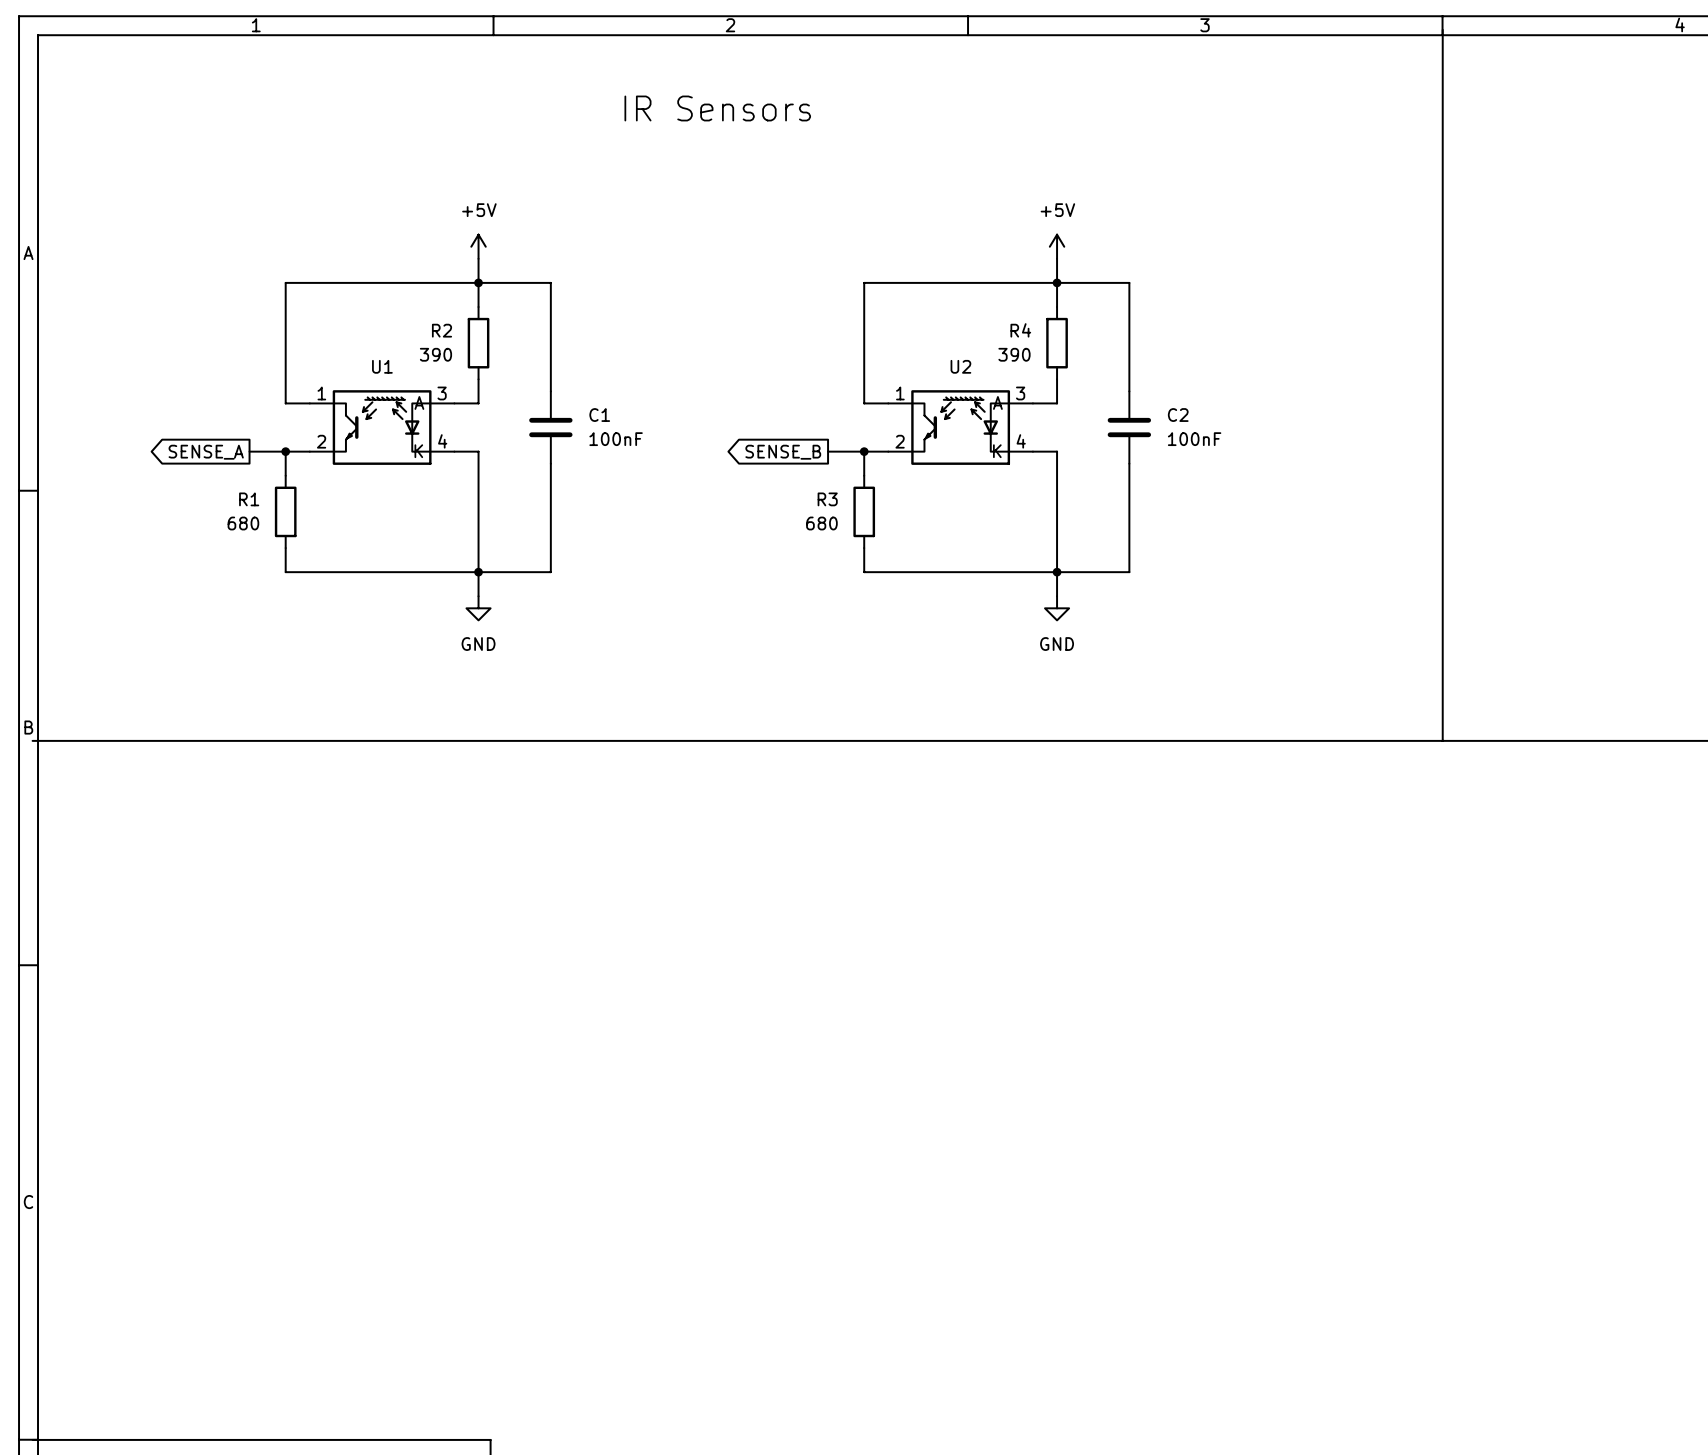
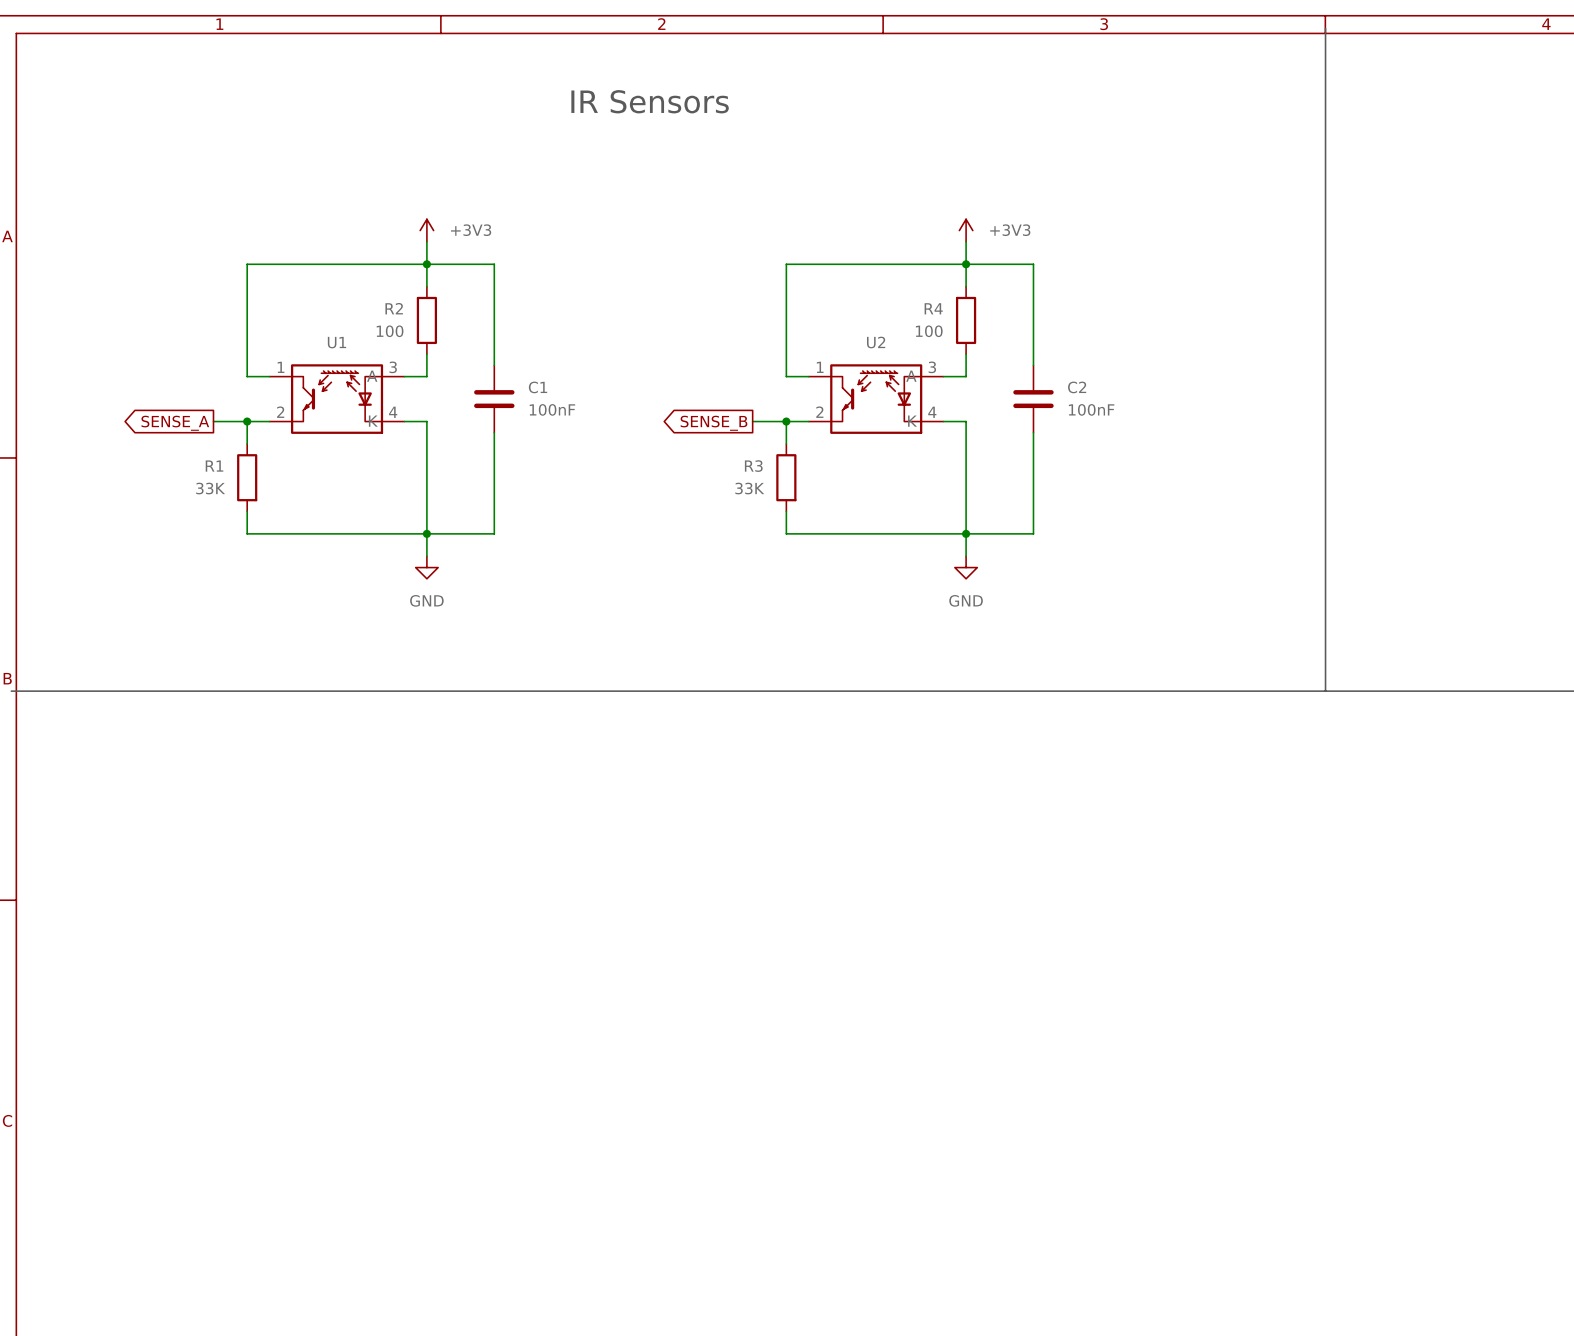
power symbol: +5V (478, 246) -> +3V3 (426, 230)
power symbol: +5V (1057, 246) -> +3V3 (966, 230)
R2 value: 390 (435, 354) -> 100 (390, 331)
R4 value: 390 (1014, 354) -> 100 (929, 331)
R1 value: 680 (243, 523) -> 33K (210, 488)
R3 value: 680 (821, 523) -> 33K (749, 488)

